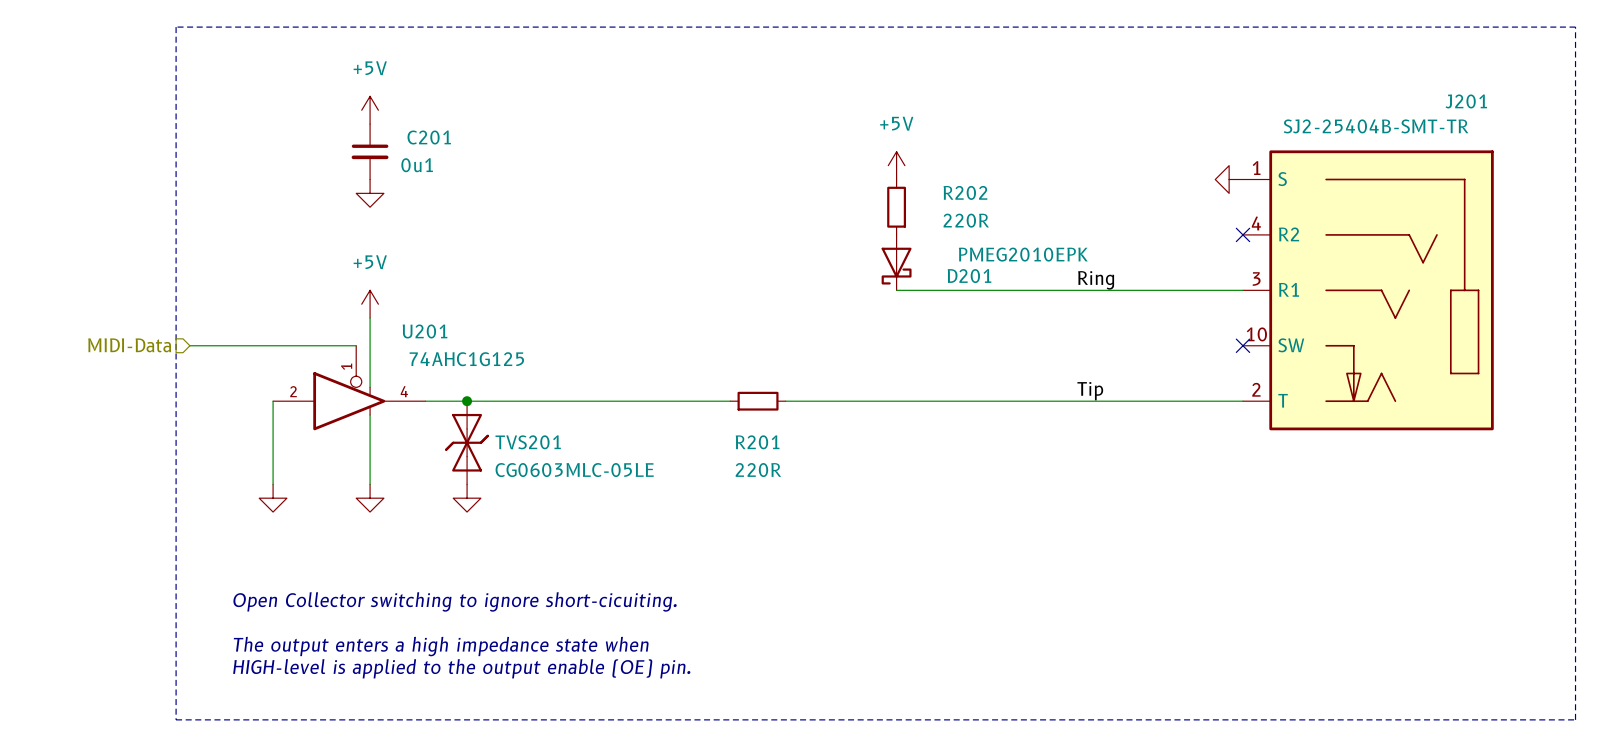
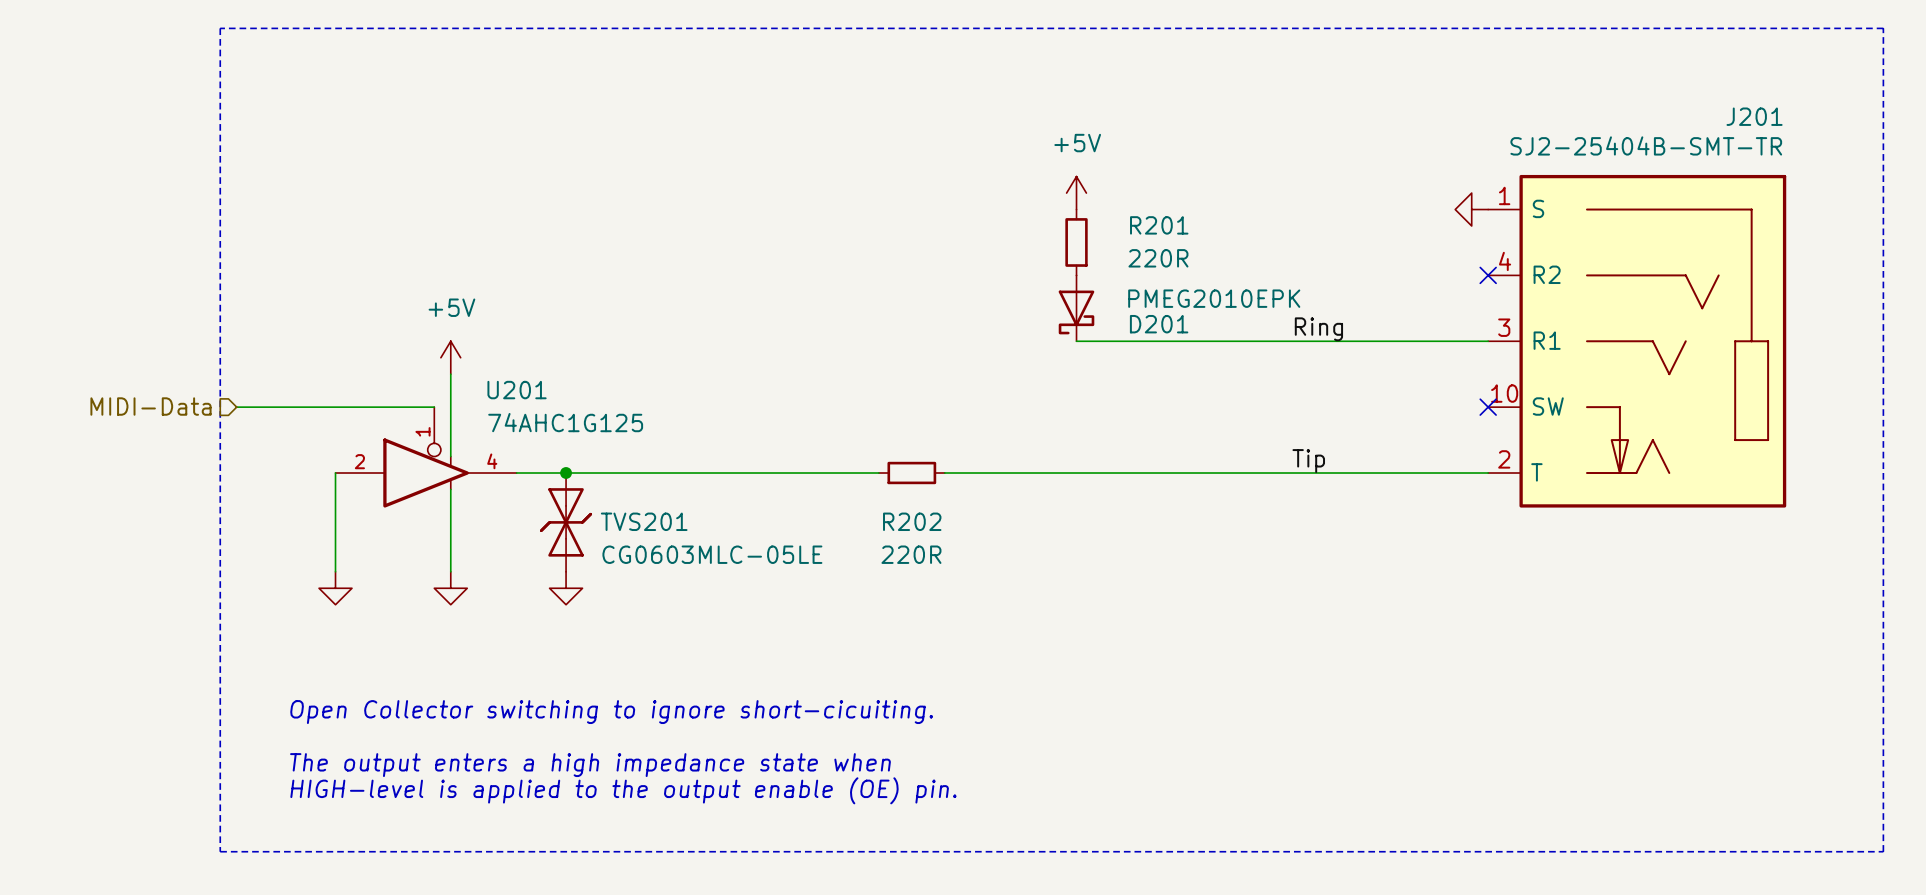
power symbol: +5V (370, 110) -> none
C201: 0u1 (370, 151) -> none
R202 name: R202 (965, 192) -> R201 (1159, 225)
power symbol: (370, 193) -> none
R201 name: R201 (757, 442) -> R202 (912, 521)

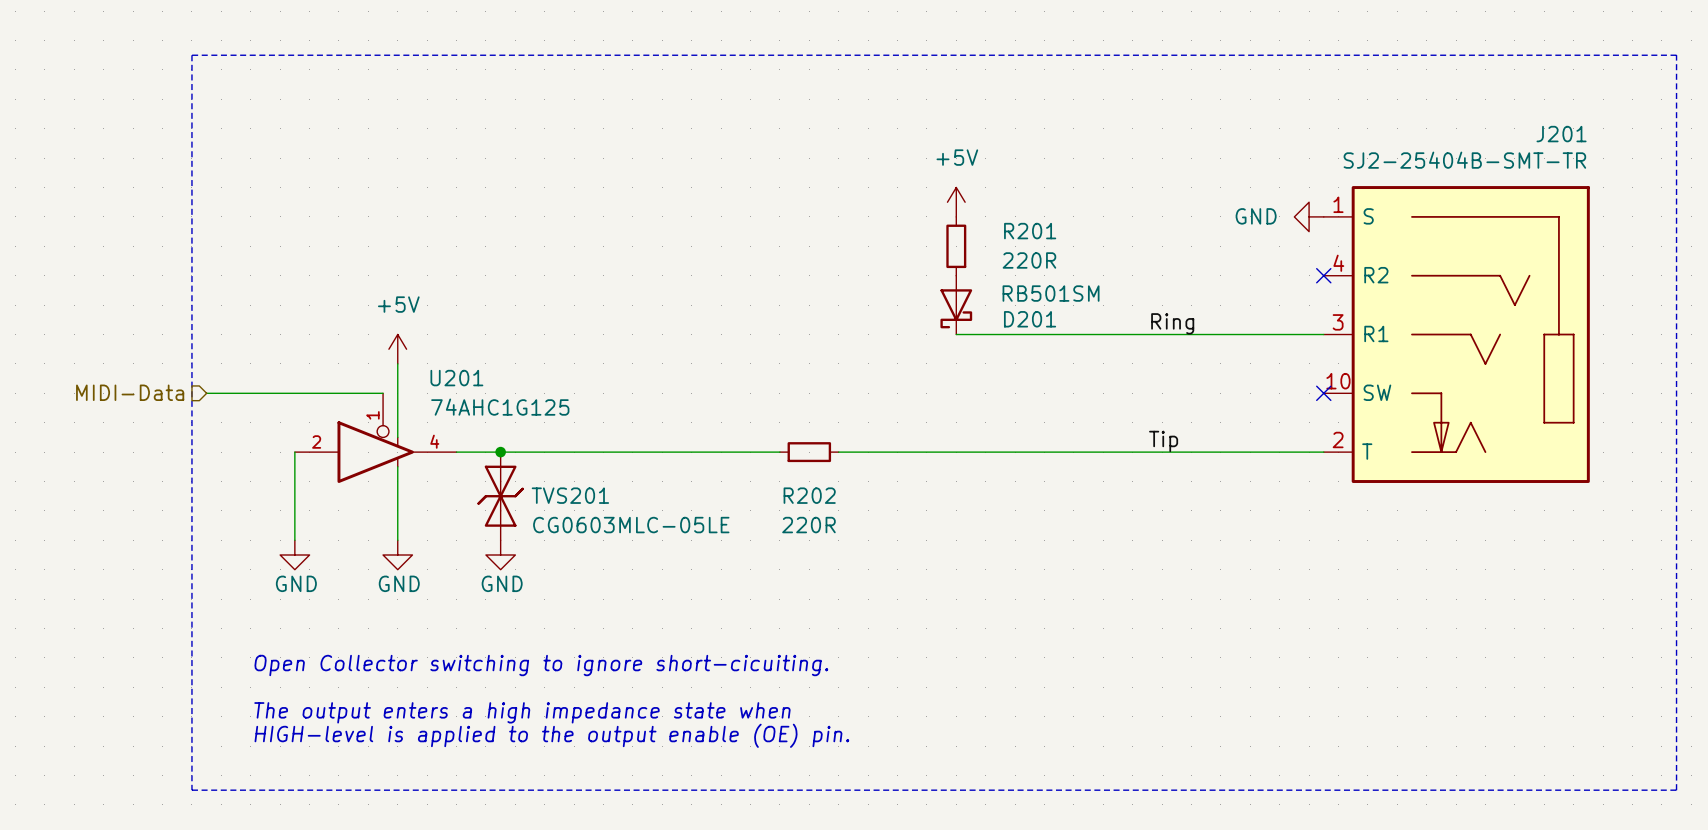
power symbol text: none -> GND (1256, 216)
D201 value: PMEG2010EPK (1214, 298) -> RB501SM (1051, 293)
power symbol text: none -> GND (296, 583)
power symbol text: none -> GND (399, 583)
power symbol text: none -> GND (502, 583)

